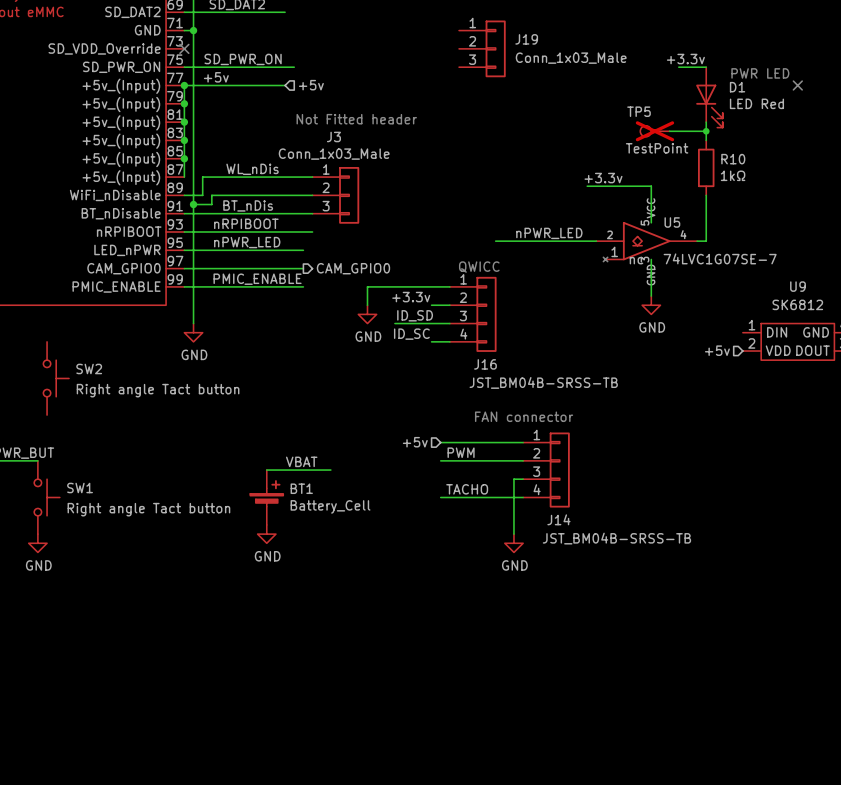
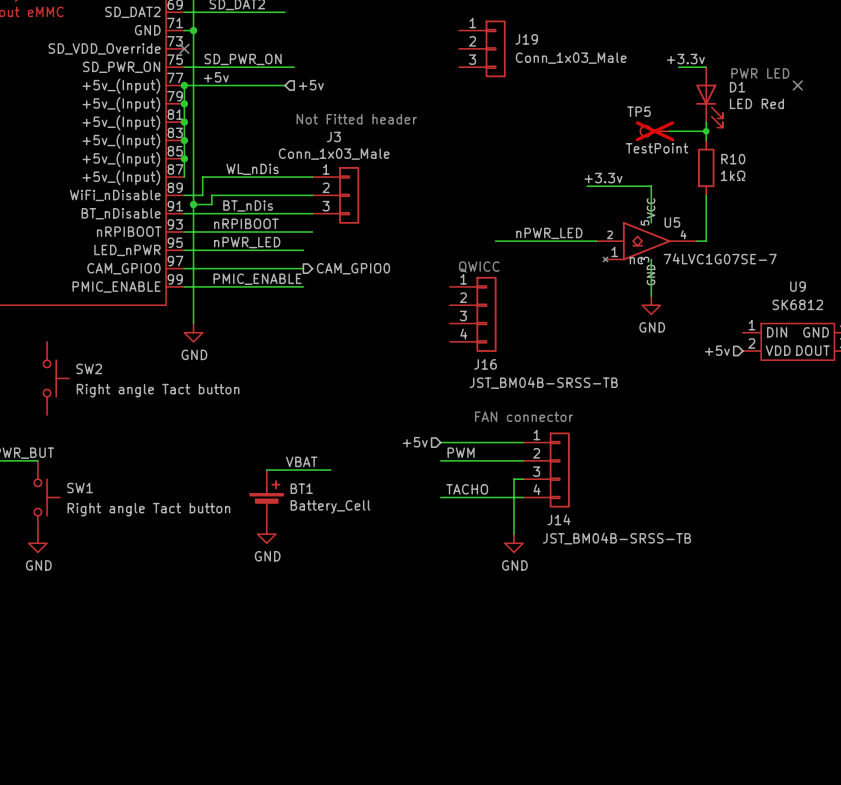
wire: (449, 286) (367, 286) (367, 305) -> none
label: +3.3v (411, 297) -> none
wire: (431, 305) (449, 305) -> none
power symbol: GND (367, 314) -> none
label: ID_SD (415, 315) -> none
wire: (394, 323) (449, 323) -> none
label: ID_SC (411, 334) -> none
wire: (431, 341) (449, 341) -> none

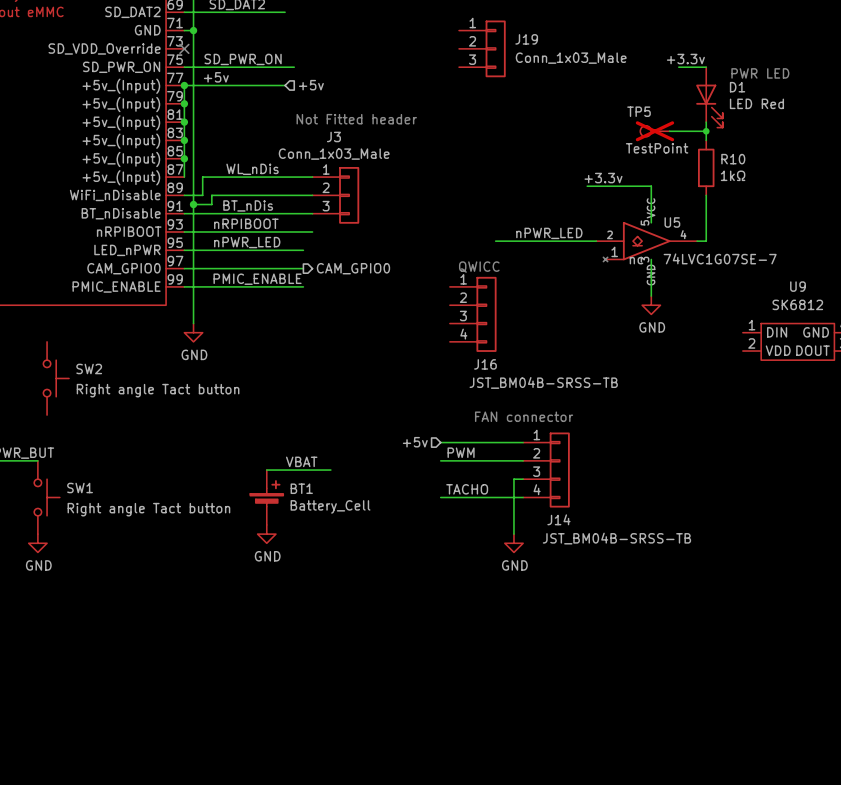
no-connect mark: (797, 85) -> none
hierarchical label: +5v (717, 350) -> none

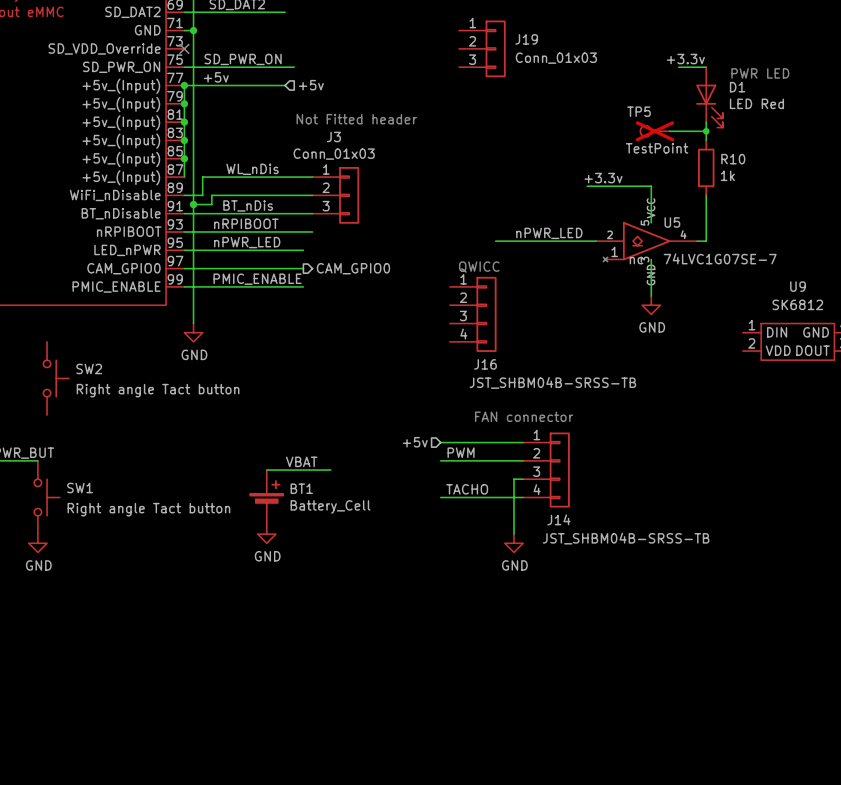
J19 value: Conn_1x03_Male (571, 58) -> Conn_01x03 (556, 58)
J3 value: Conn_1x03_Male (334, 154) -> Conn_01x03 (334, 154)
R10 value: 1kΩ (733, 175) -> 1k (727, 175)
J16 value: JST_BM04B-SRSS-TB (543, 382) -> JST_SHBM04B-SRSS-TB (552, 382)
J14 value: JST_BM04B-SRSS-TB (616, 538) -> JST_SHBM04B-SRSS-TB (626, 538)

